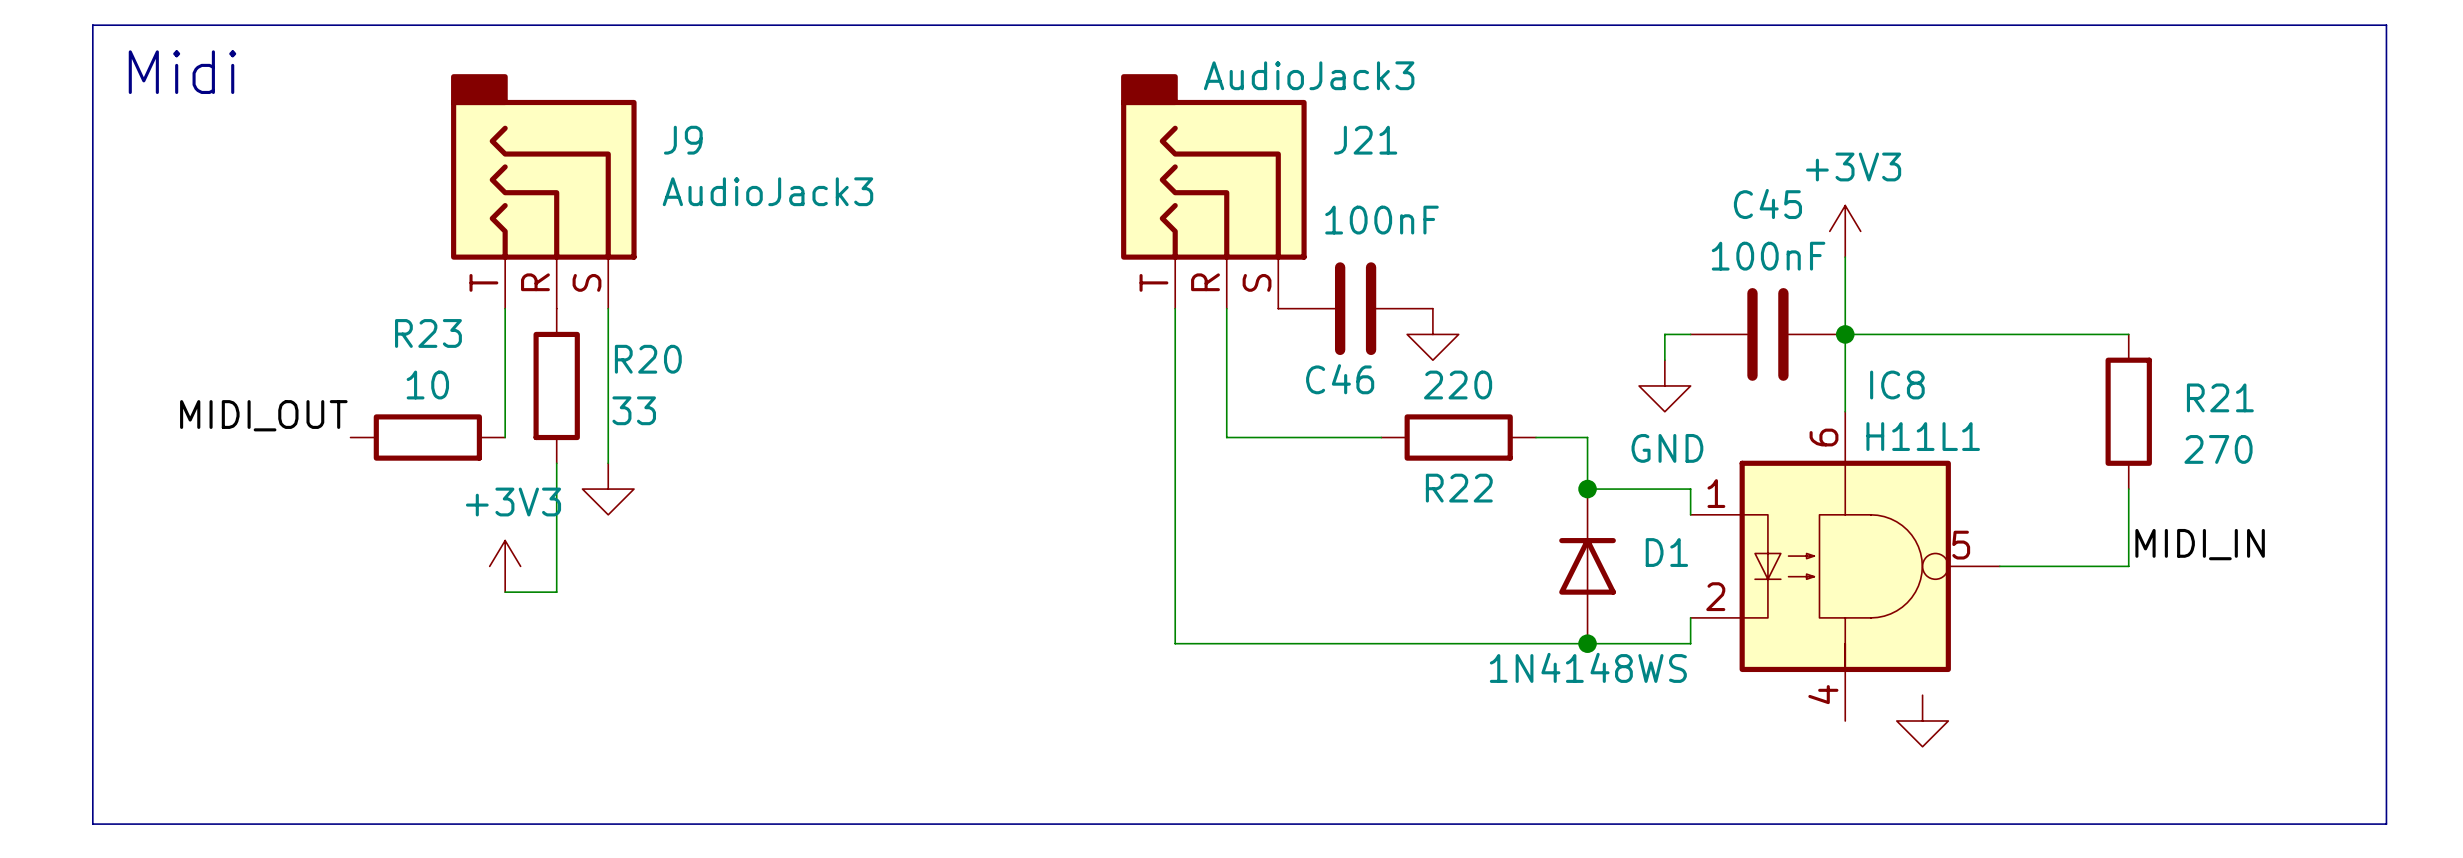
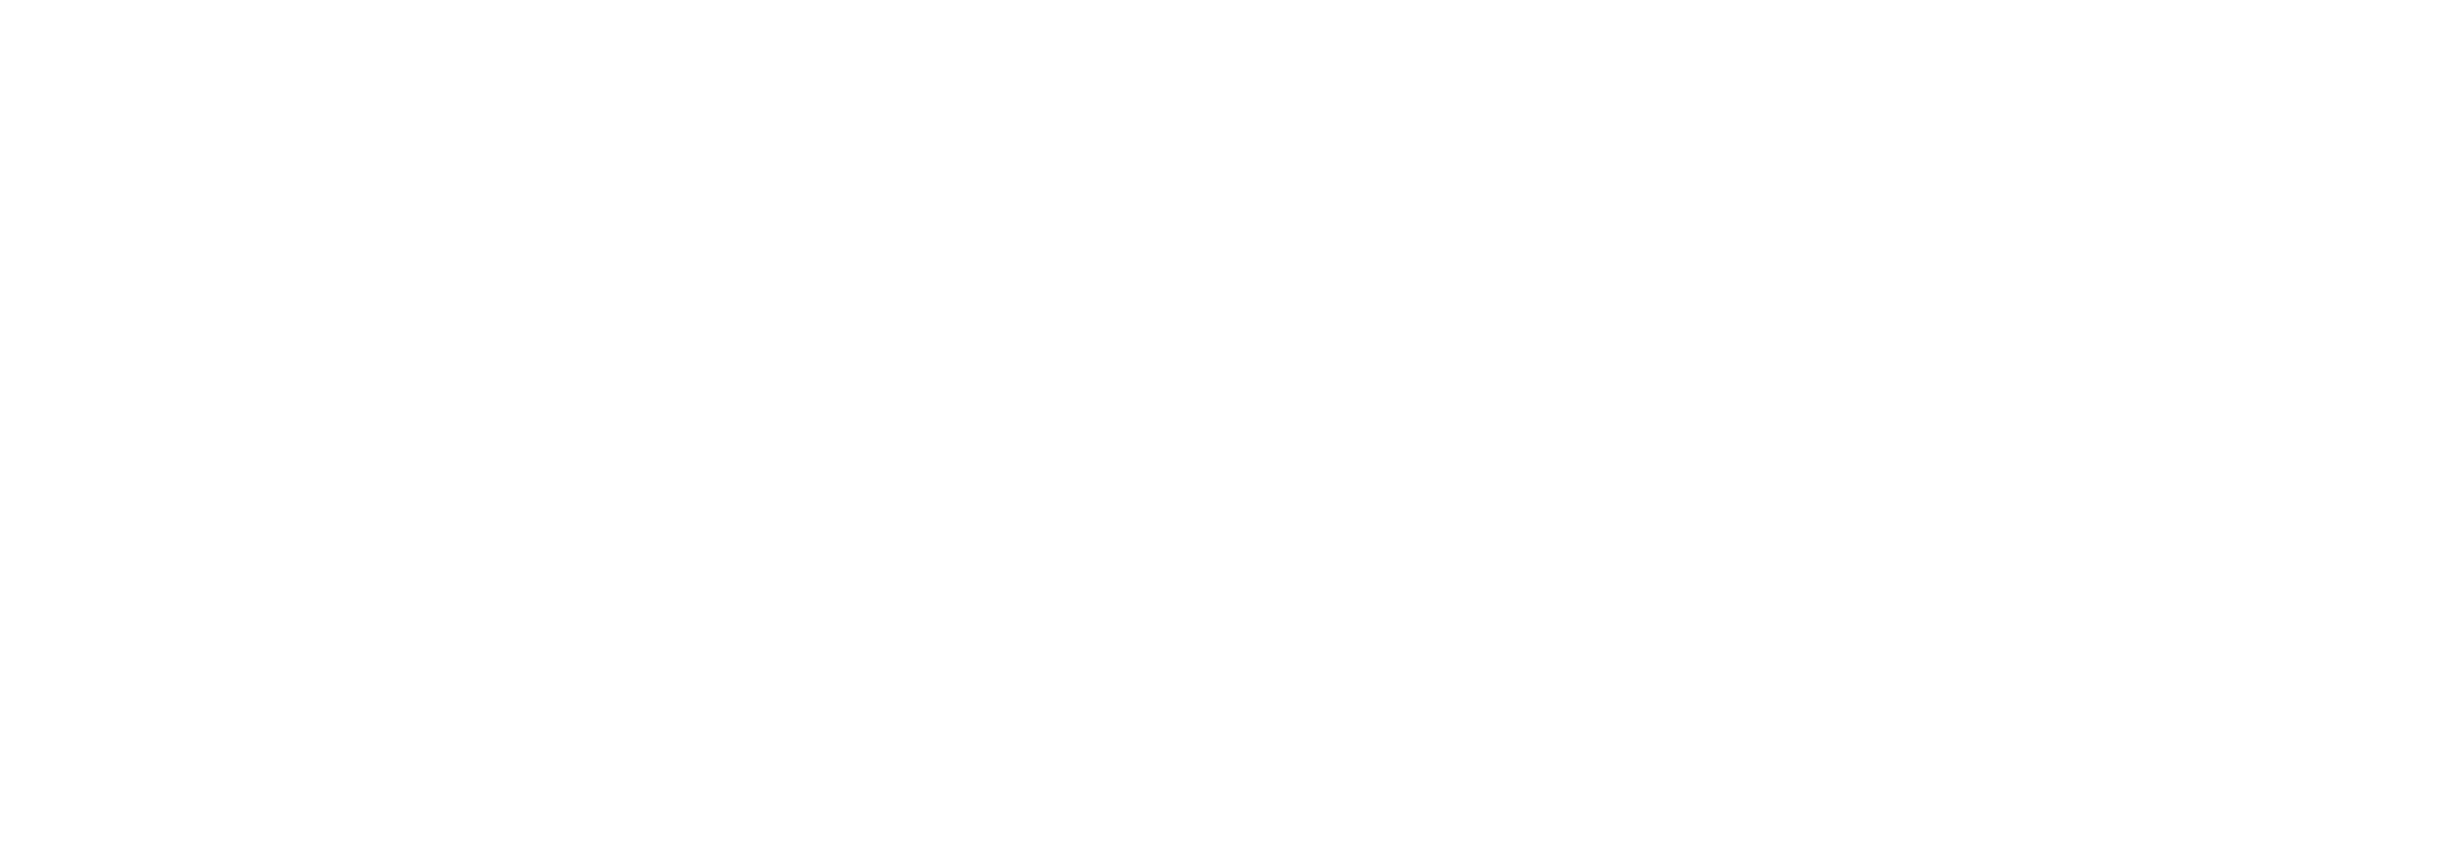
line: (92, 25) (2386, 25) (2386, 824) (92, 824) (92, 25) -> none
text: Midi (182, 72) -> none
J9: AudioJack3 (543, 191) -> none
J21: AudioJack3 (1213, 191) -> none
power symbol: +3V3 (1845, 231) -> none
wire: (1845, 257) (1845, 411) -> none
wire: (505, 308) (505, 437) -> none
wire: (608, 308) (608, 463) -> none
wire: (1175, 308) (1175, 643) (1690, 643) (1690, 617) -> none
wire: (1226, 308) (1226, 437) (1381, 437) -> none
C46: 100nF (1355, 308) -> none
power symbol: (1432, 334) -> none
wire: (1690, 334) (1664, 334) (1664, 360) -> none
C45: 100nF (1767, 334) -> none
wire: (1845, 334) (2128, 334) -> none
junction: (1845, 334) -> none
R20: 33 (556, 385) -> none
power symbol: GND (1664, 385) -> none
R21: 270 (2128, 411) -> none
label: MIDI_OUT (263, 415) -> none
R23: 10 (427, 437) -> none
R22: 220 (1458, 437) -> none
wire: (1536, 437) (1587, 437) (1587, 489) (1690, 489) (1690, 514) -> none
wire: (556, 463) (556, 592) (505, 592) -> none
power symbol: (608, 489) -> none
junction: (1587, 489) -> none
wire: (2128, 489) (2128, 566) (1999, 566) -> none
label: MIDI_IN (2200, 544) -> none
power symbol: +3V3 (505, 566) -> none
D1: 1N4148WS (1587, 566) -> none
IC8: H11L1 (1845, 566) -> none
junction: (1587, 643) -> none
power symbol: (1922, 721) -> none

